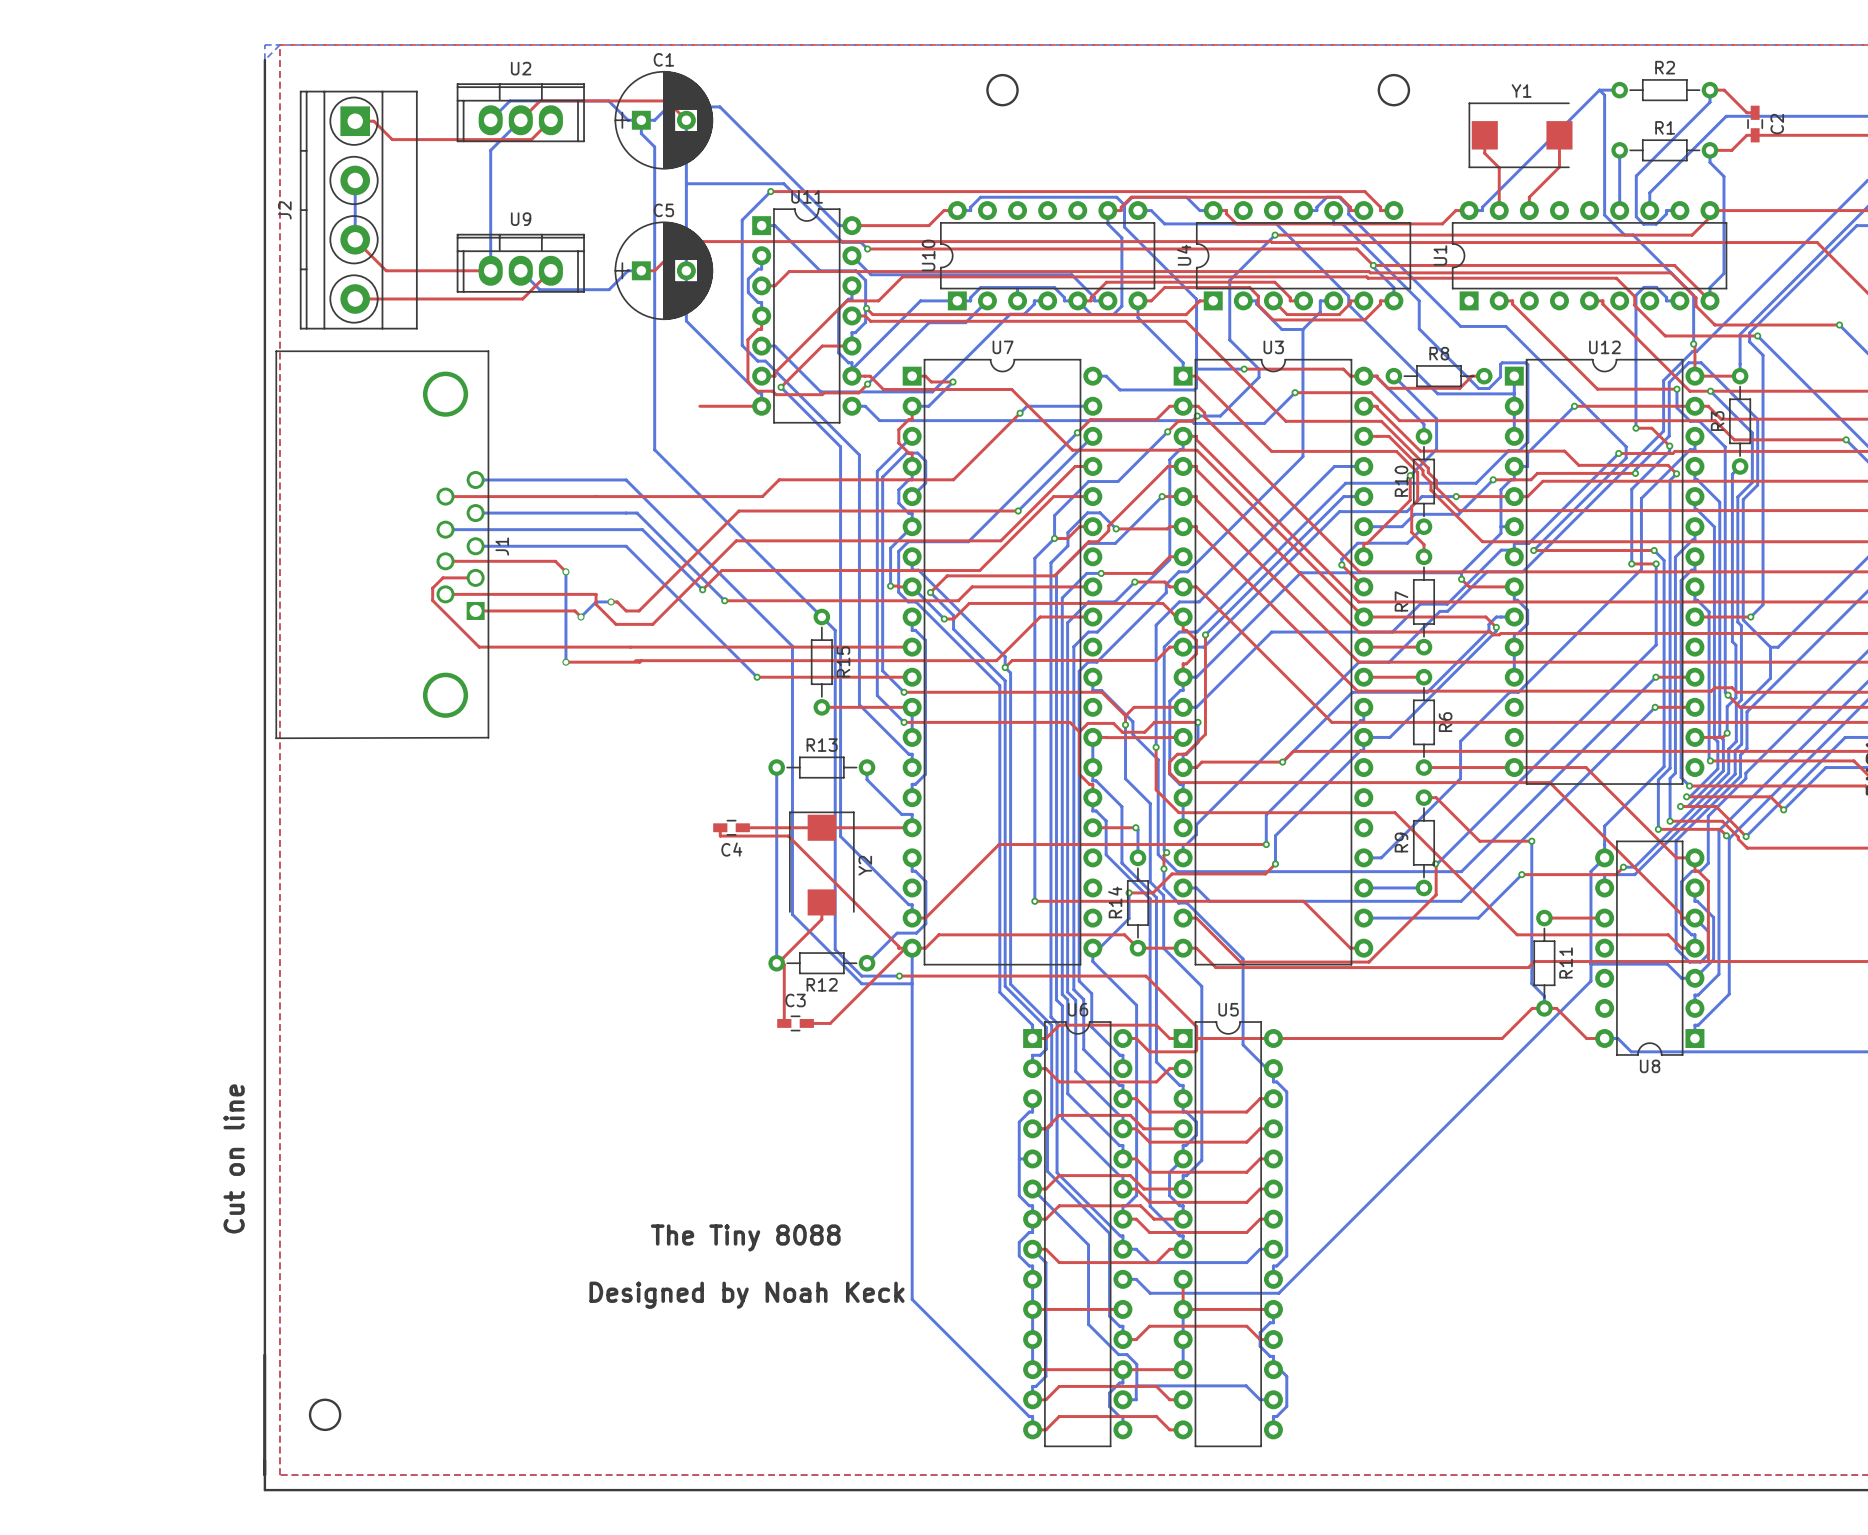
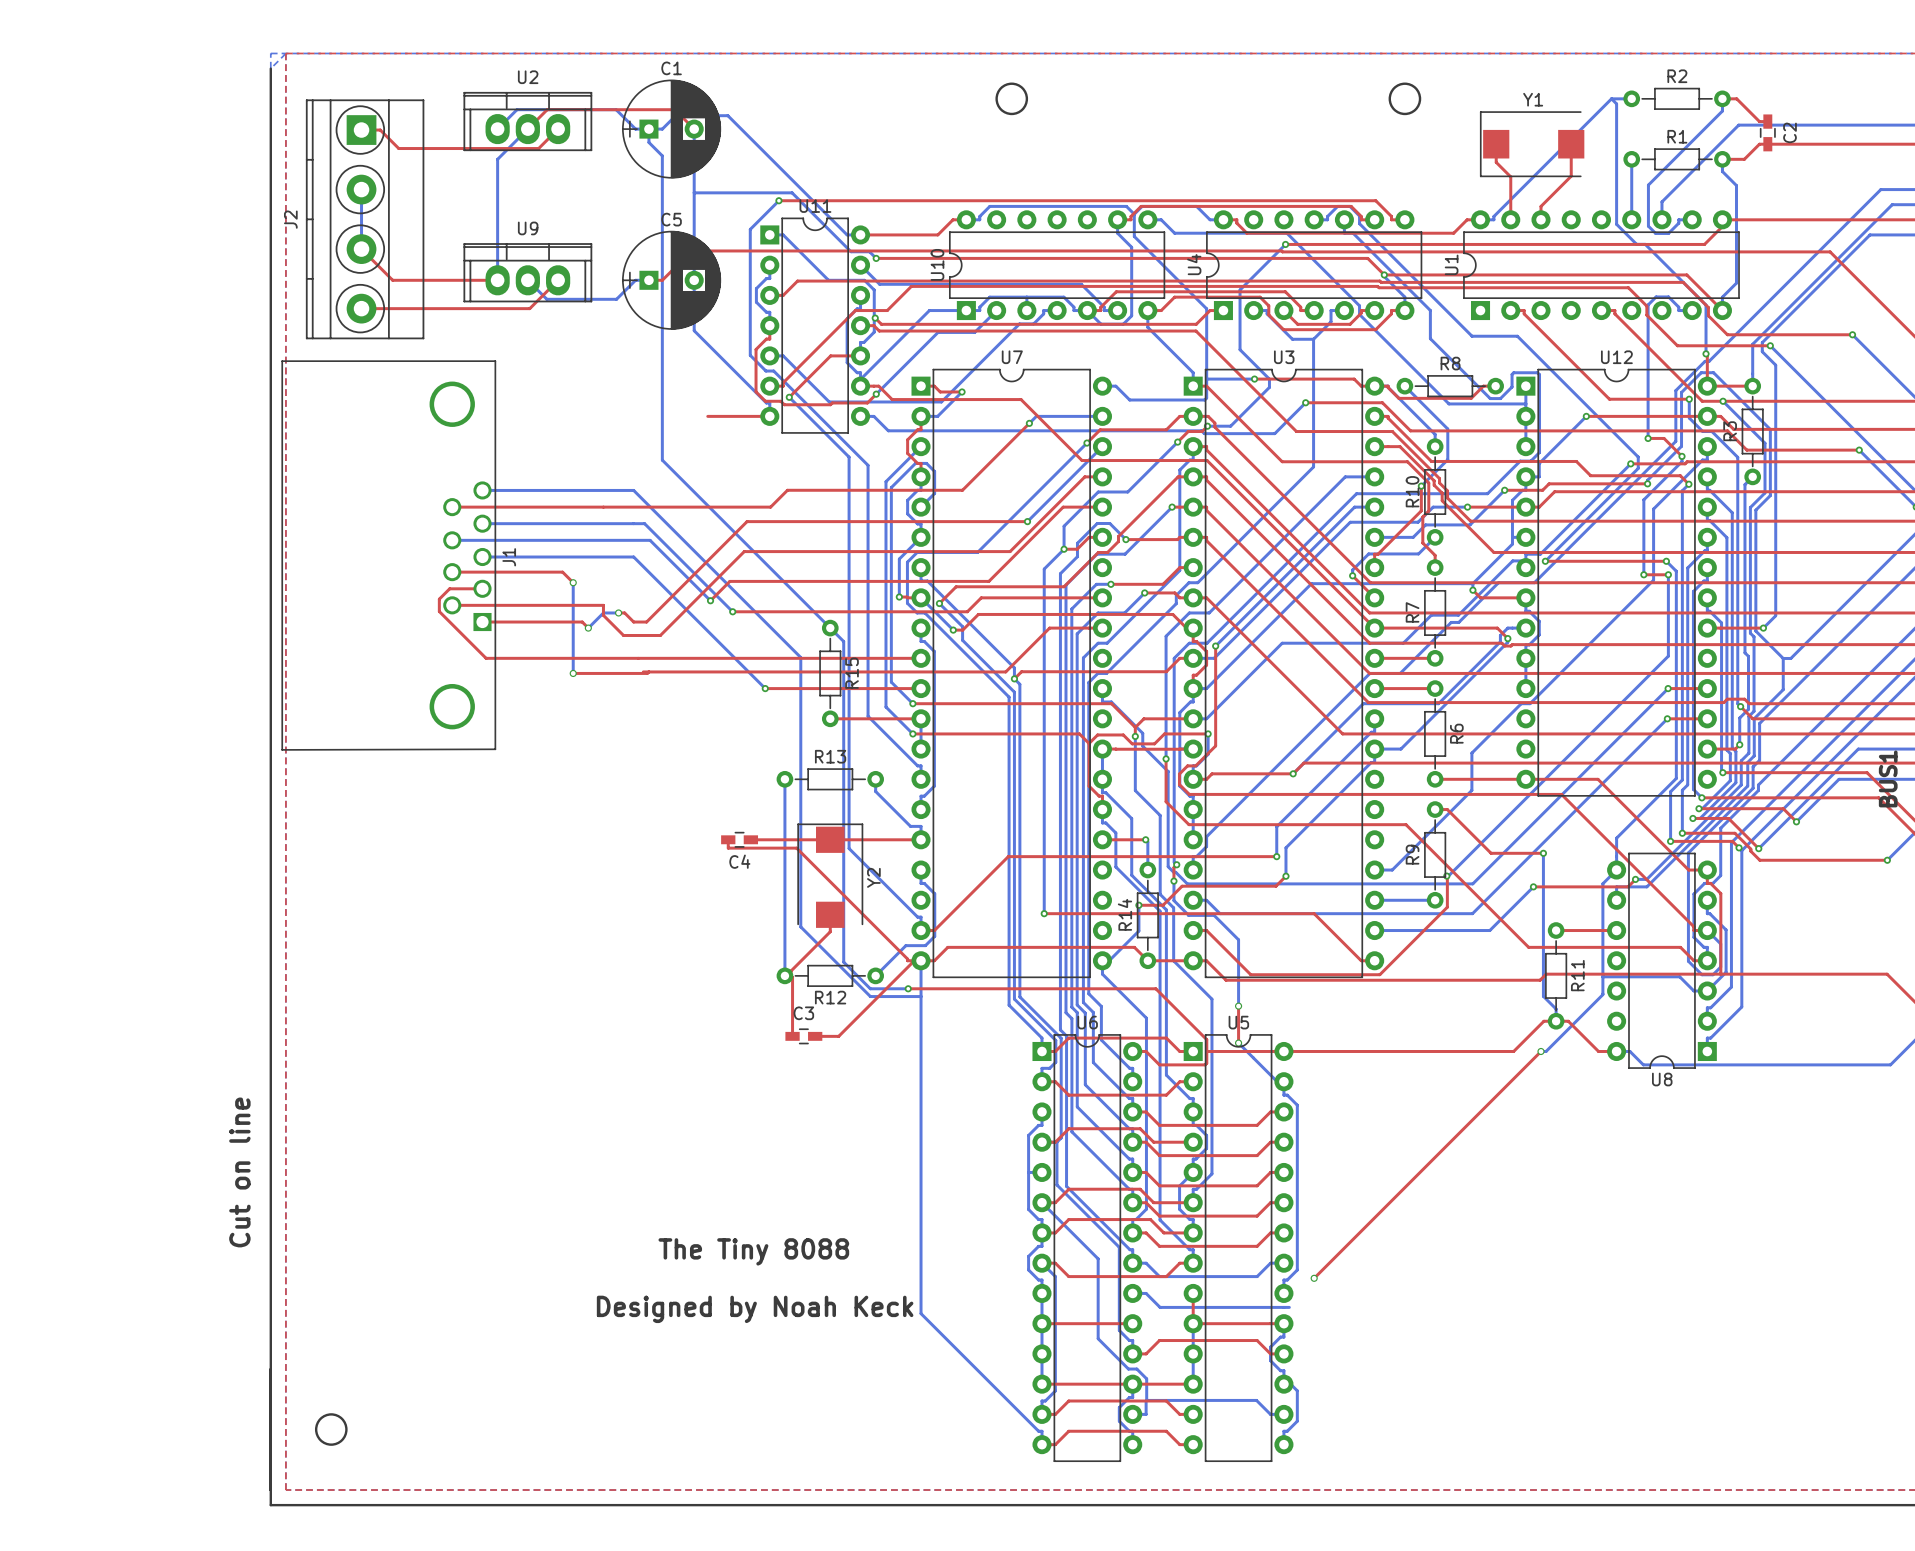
bottom track: (1187, 903) (1243, 959) (1243, 1044) -> (1197, 915) (1214, 915) (1238, 939) (1238, 1006)
bottom track: (1590, 981) (1278, 1293) -> (1602, 993) (1546, 1051) (1541, 1051)
top track: none -> (1238, 1006) (1238, 1043)
via: none -> (1238, 1006)
bottom track: none -> (1238, 1043) (1253, 1057)
via: none -> (1238, 1043)
top track: none -> (1541, 1051) (1314, 1278)
via: none -> (1541, 1051)
via: none -> (1314, 1278)

